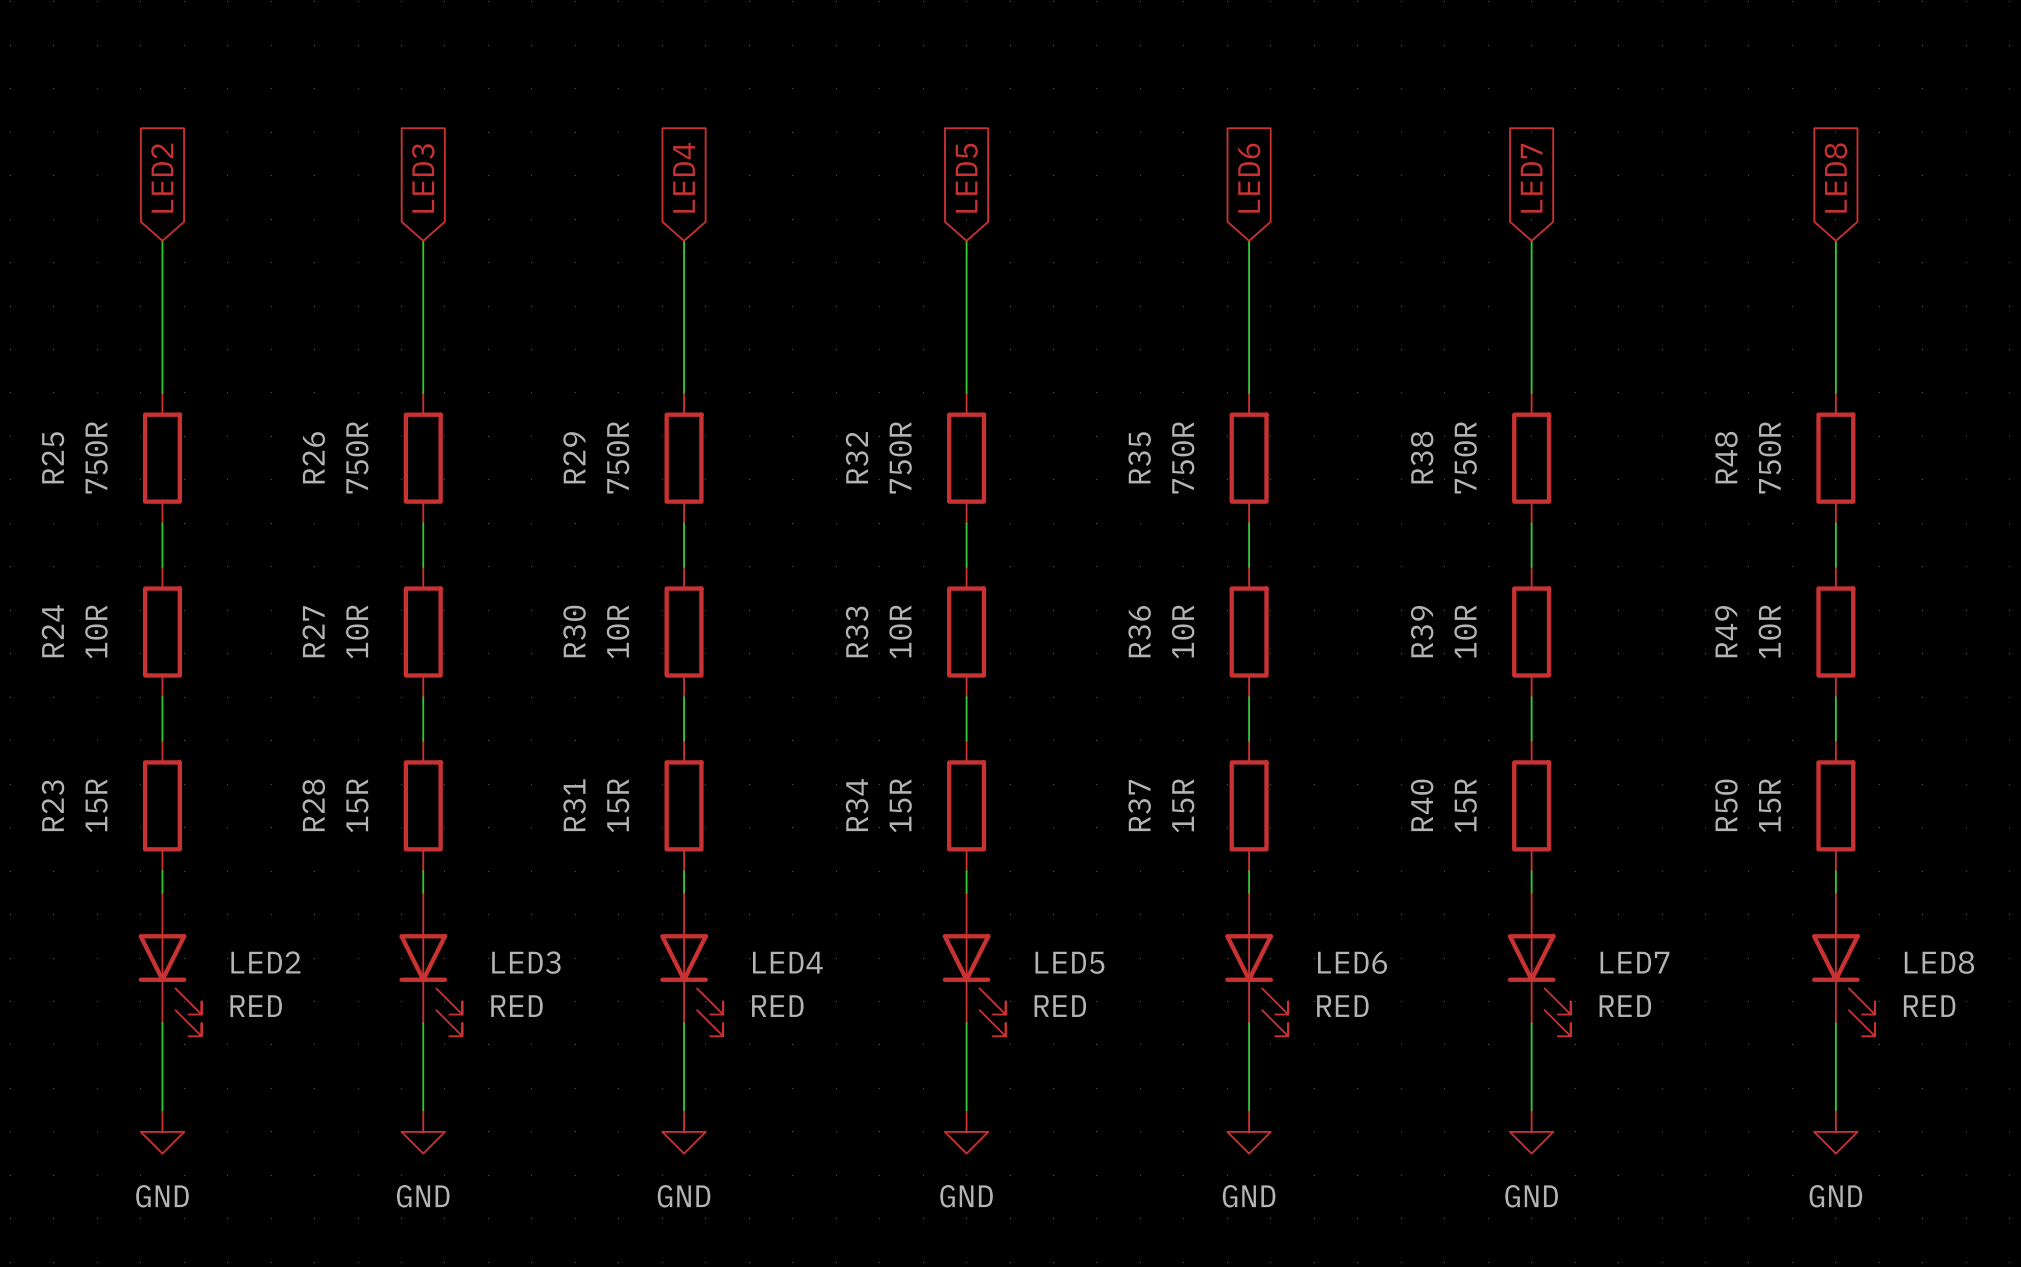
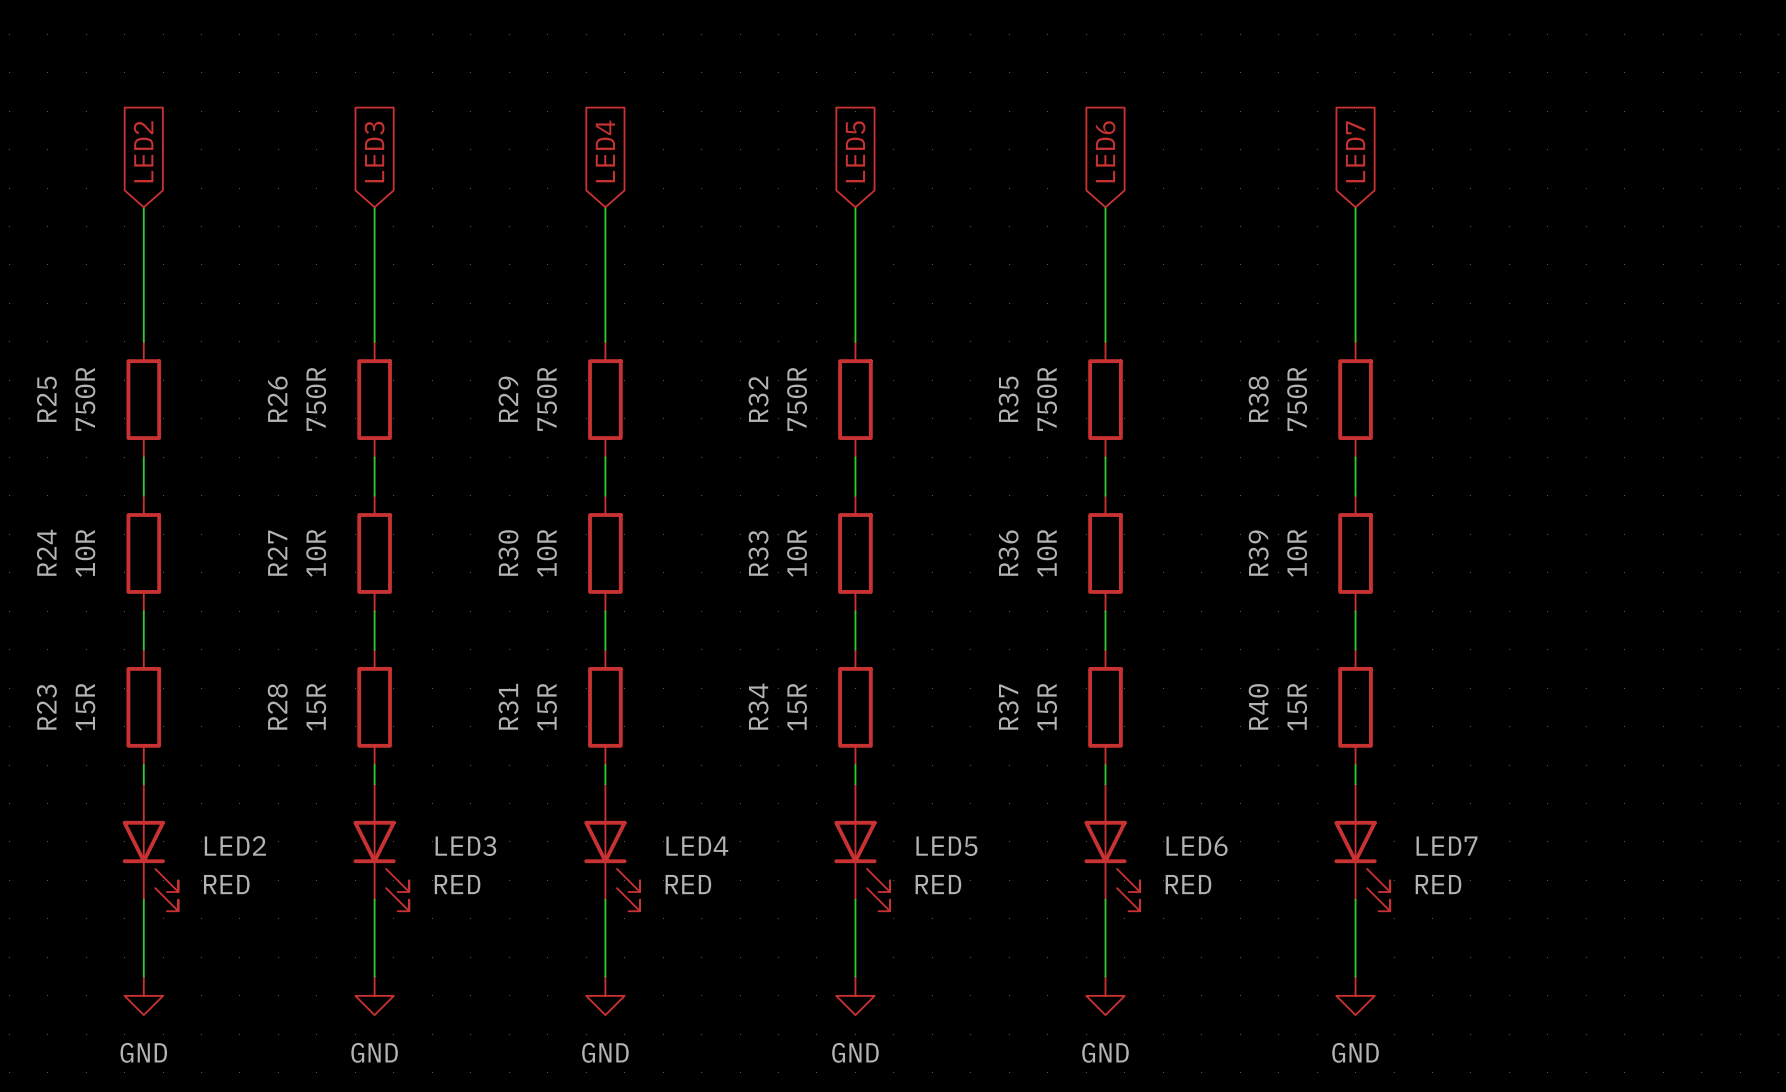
global label: LED8 (1835, 178) -> none
wire: (1835, 240) (1835, 392) -> none
R48: 750R (1835, 458) -> none
wire: (1835, 523) (1835, 566) -> none
R49: 10R (1835, 632) -> none
wire: (1835, 697) (1835, 740) -> none
R50: 15R (1835, 805) -> none
wire: (1835, 871) (1835, 892) -> none
LED8: RED (1843, 964) -> none
wire: (1835, 1023) (1835, 1110) -> none
power symbol: GND (1835, 1131) -> none

